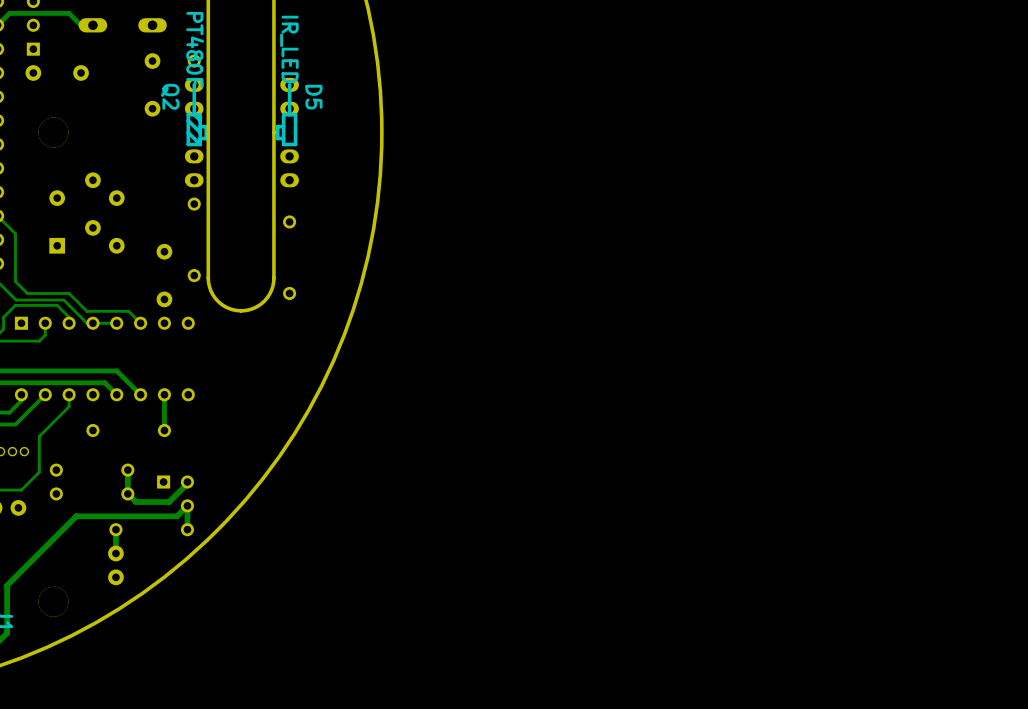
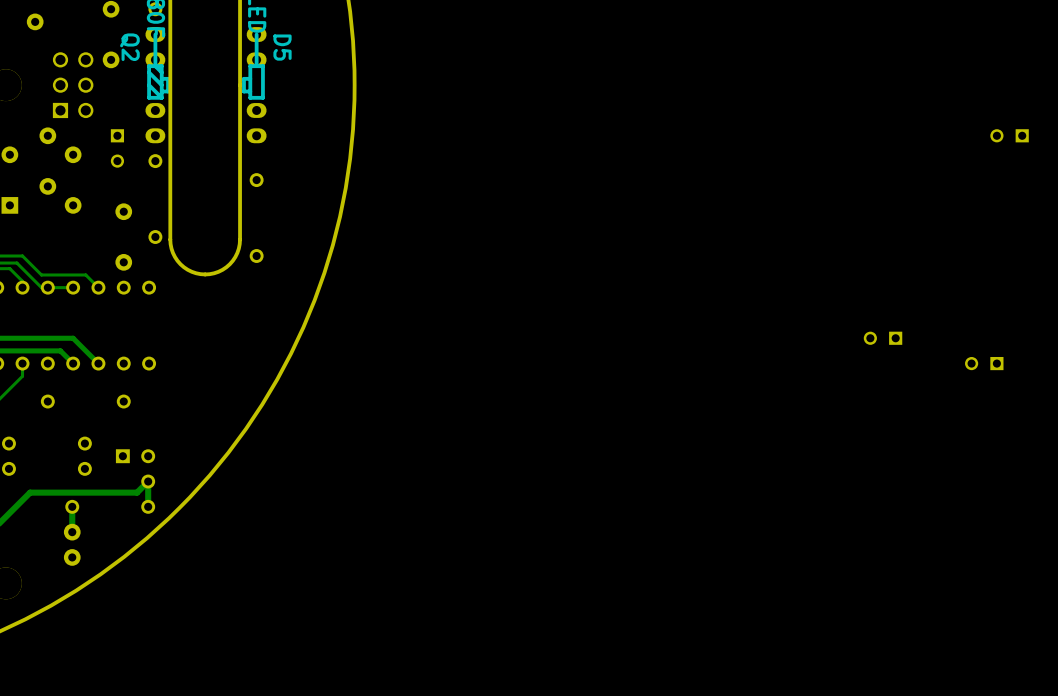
part: none -> (73, 85)
part: none -> (1009, 135)
part: none -> (117, 148)
part: none -> (883, 338)
track: (164, 394) (164, 430) -> none
part: none -> (984, 363)
track: (127, 470) (127, 493) (135, 502) (169, 502) (187, 482) -> none

